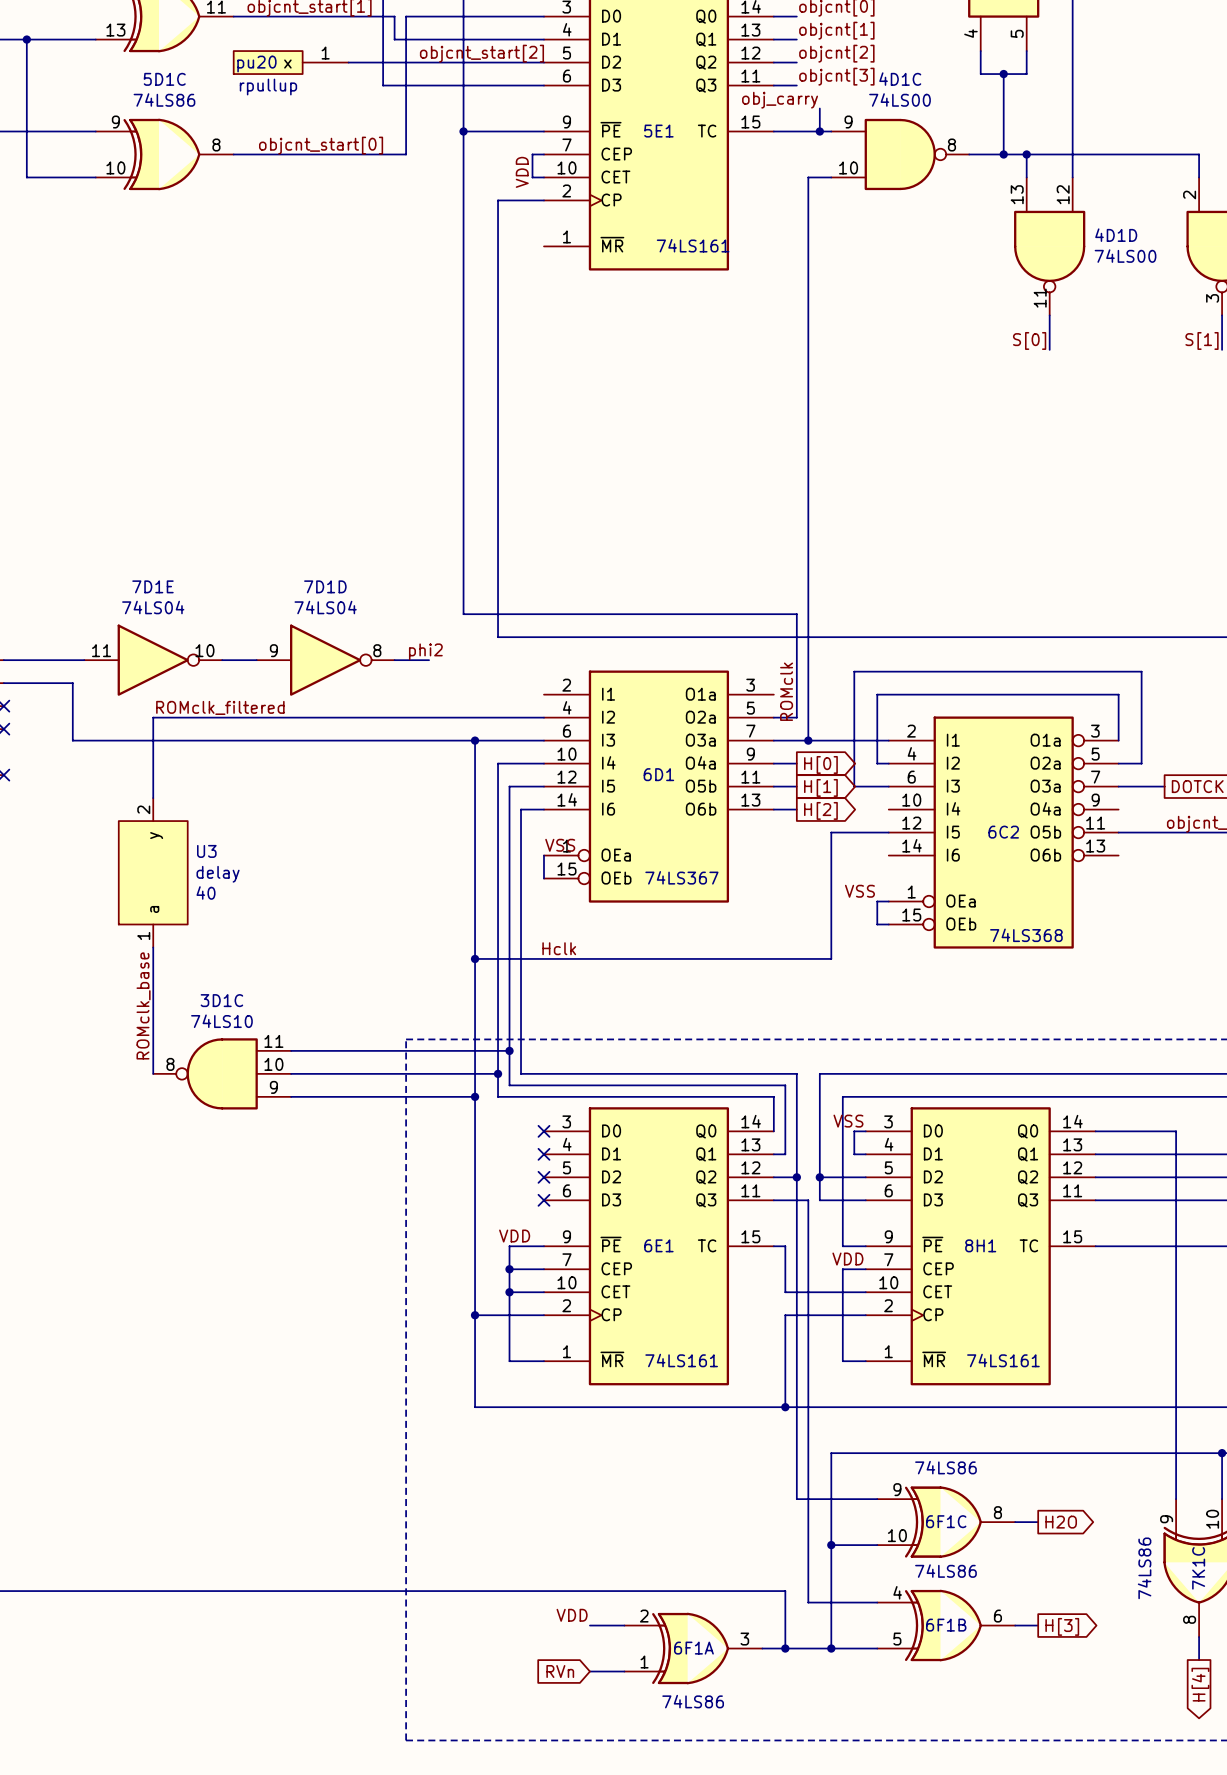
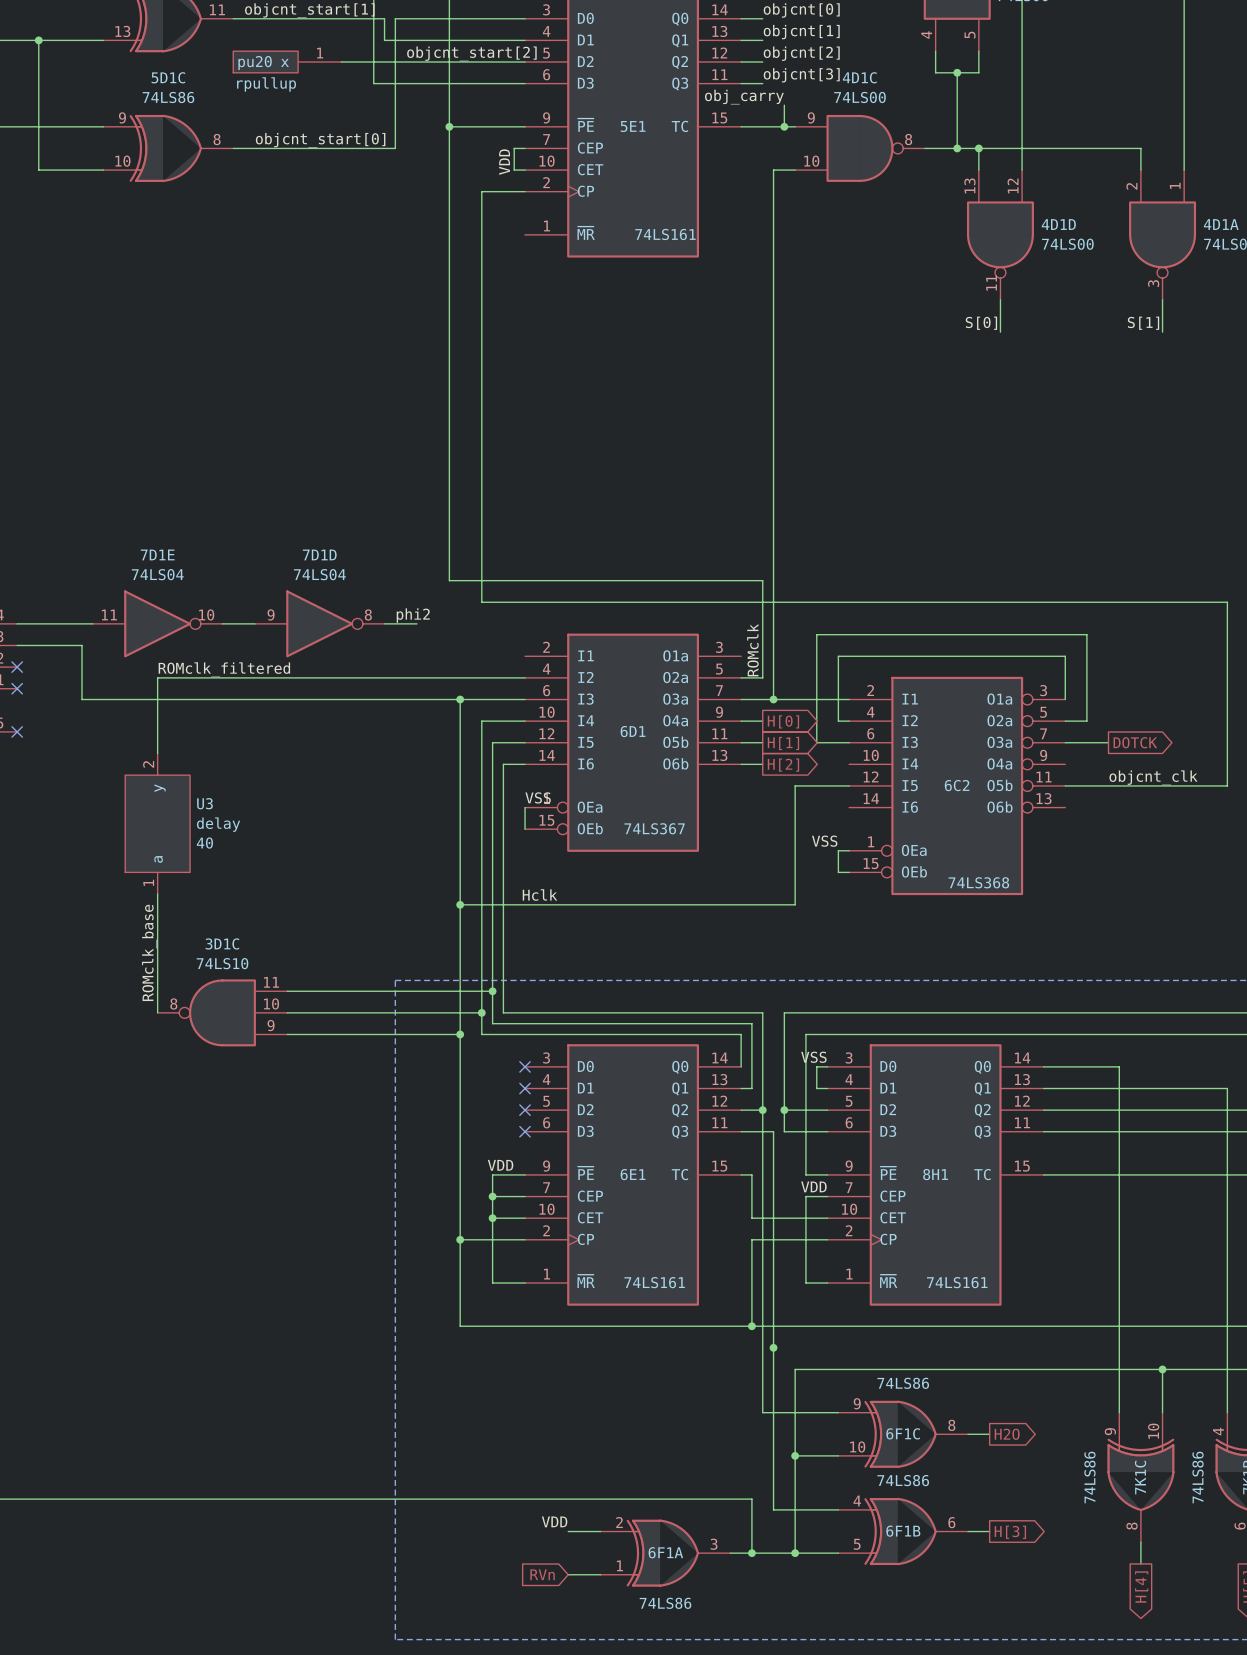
junction: none -> (773, 1347)

